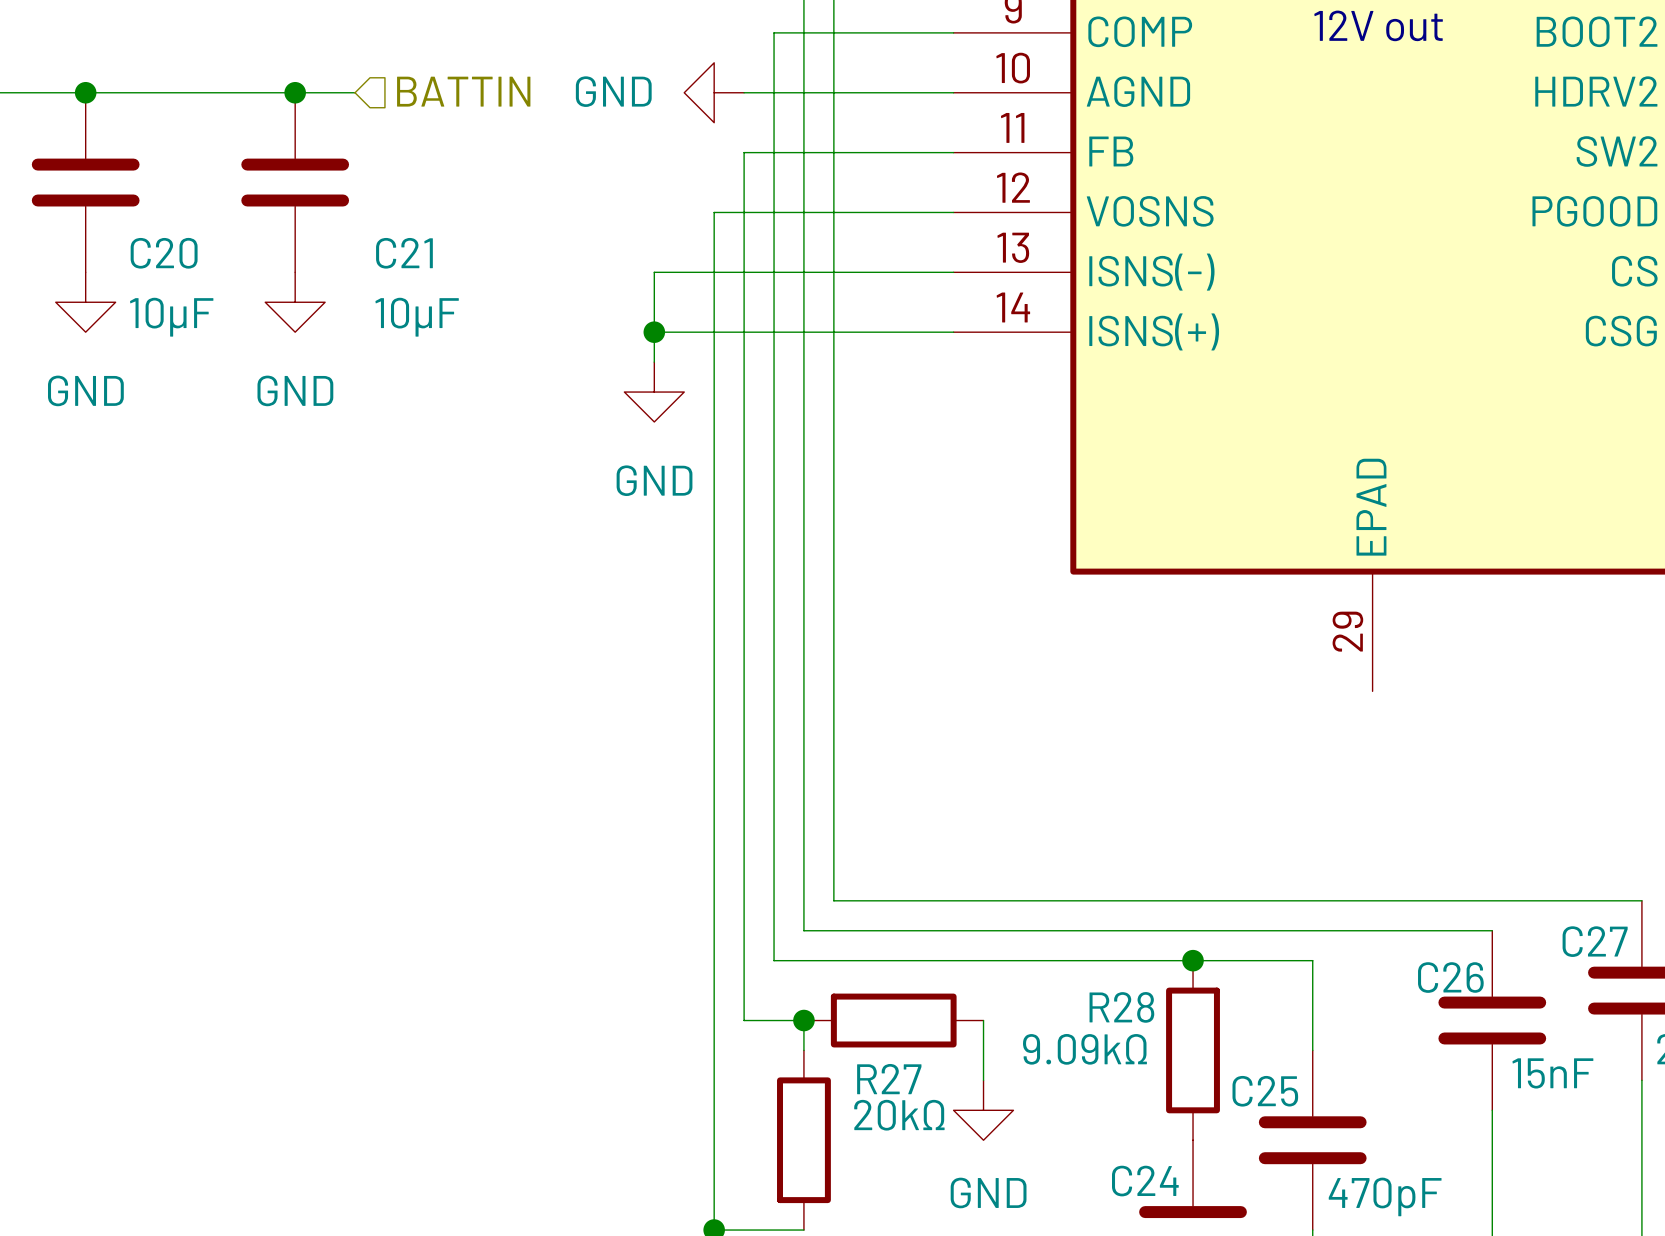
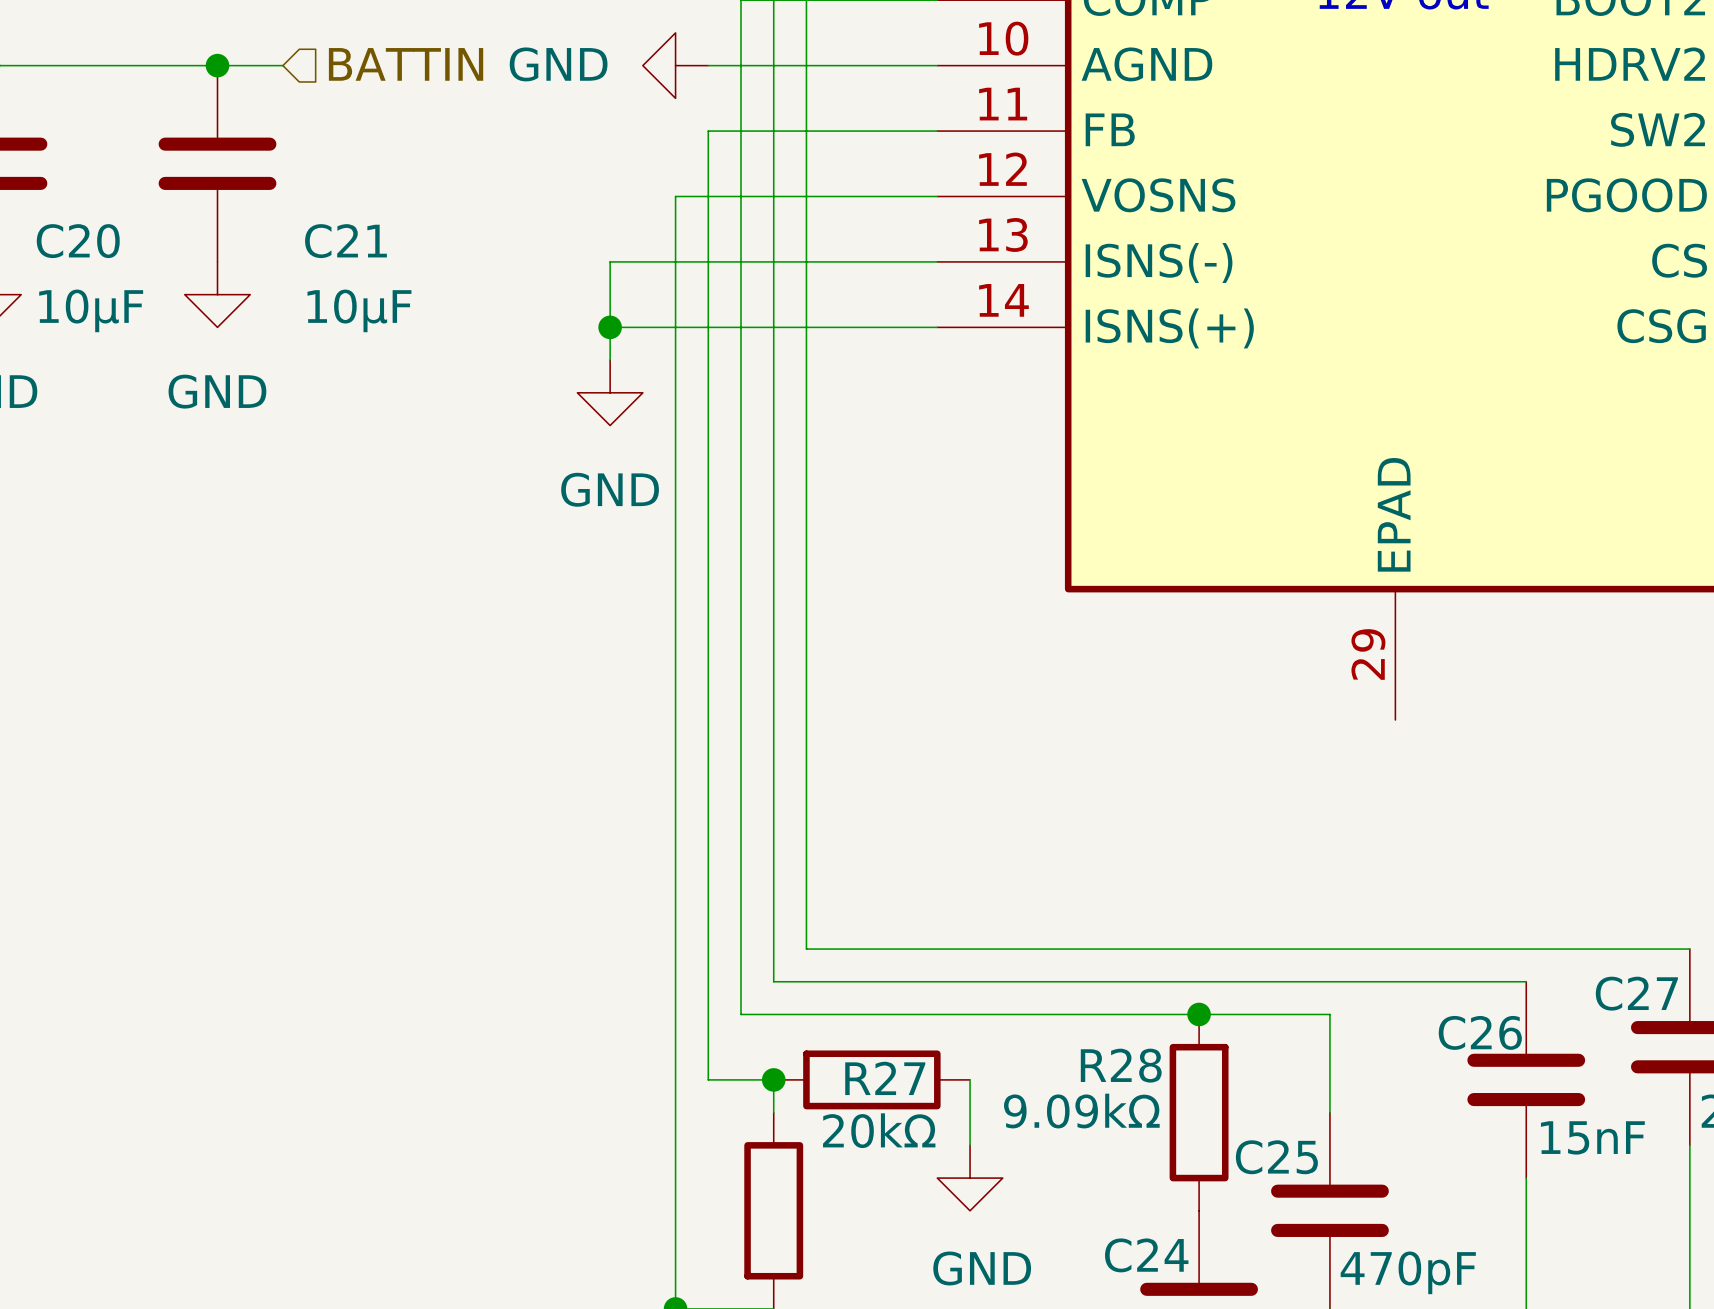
R27 name position: R27 (889, 1079) -> R27 (885, 1078)
R27 value position: 20kΩ (899, 1115) -> 20kΩ (879, 1130)

